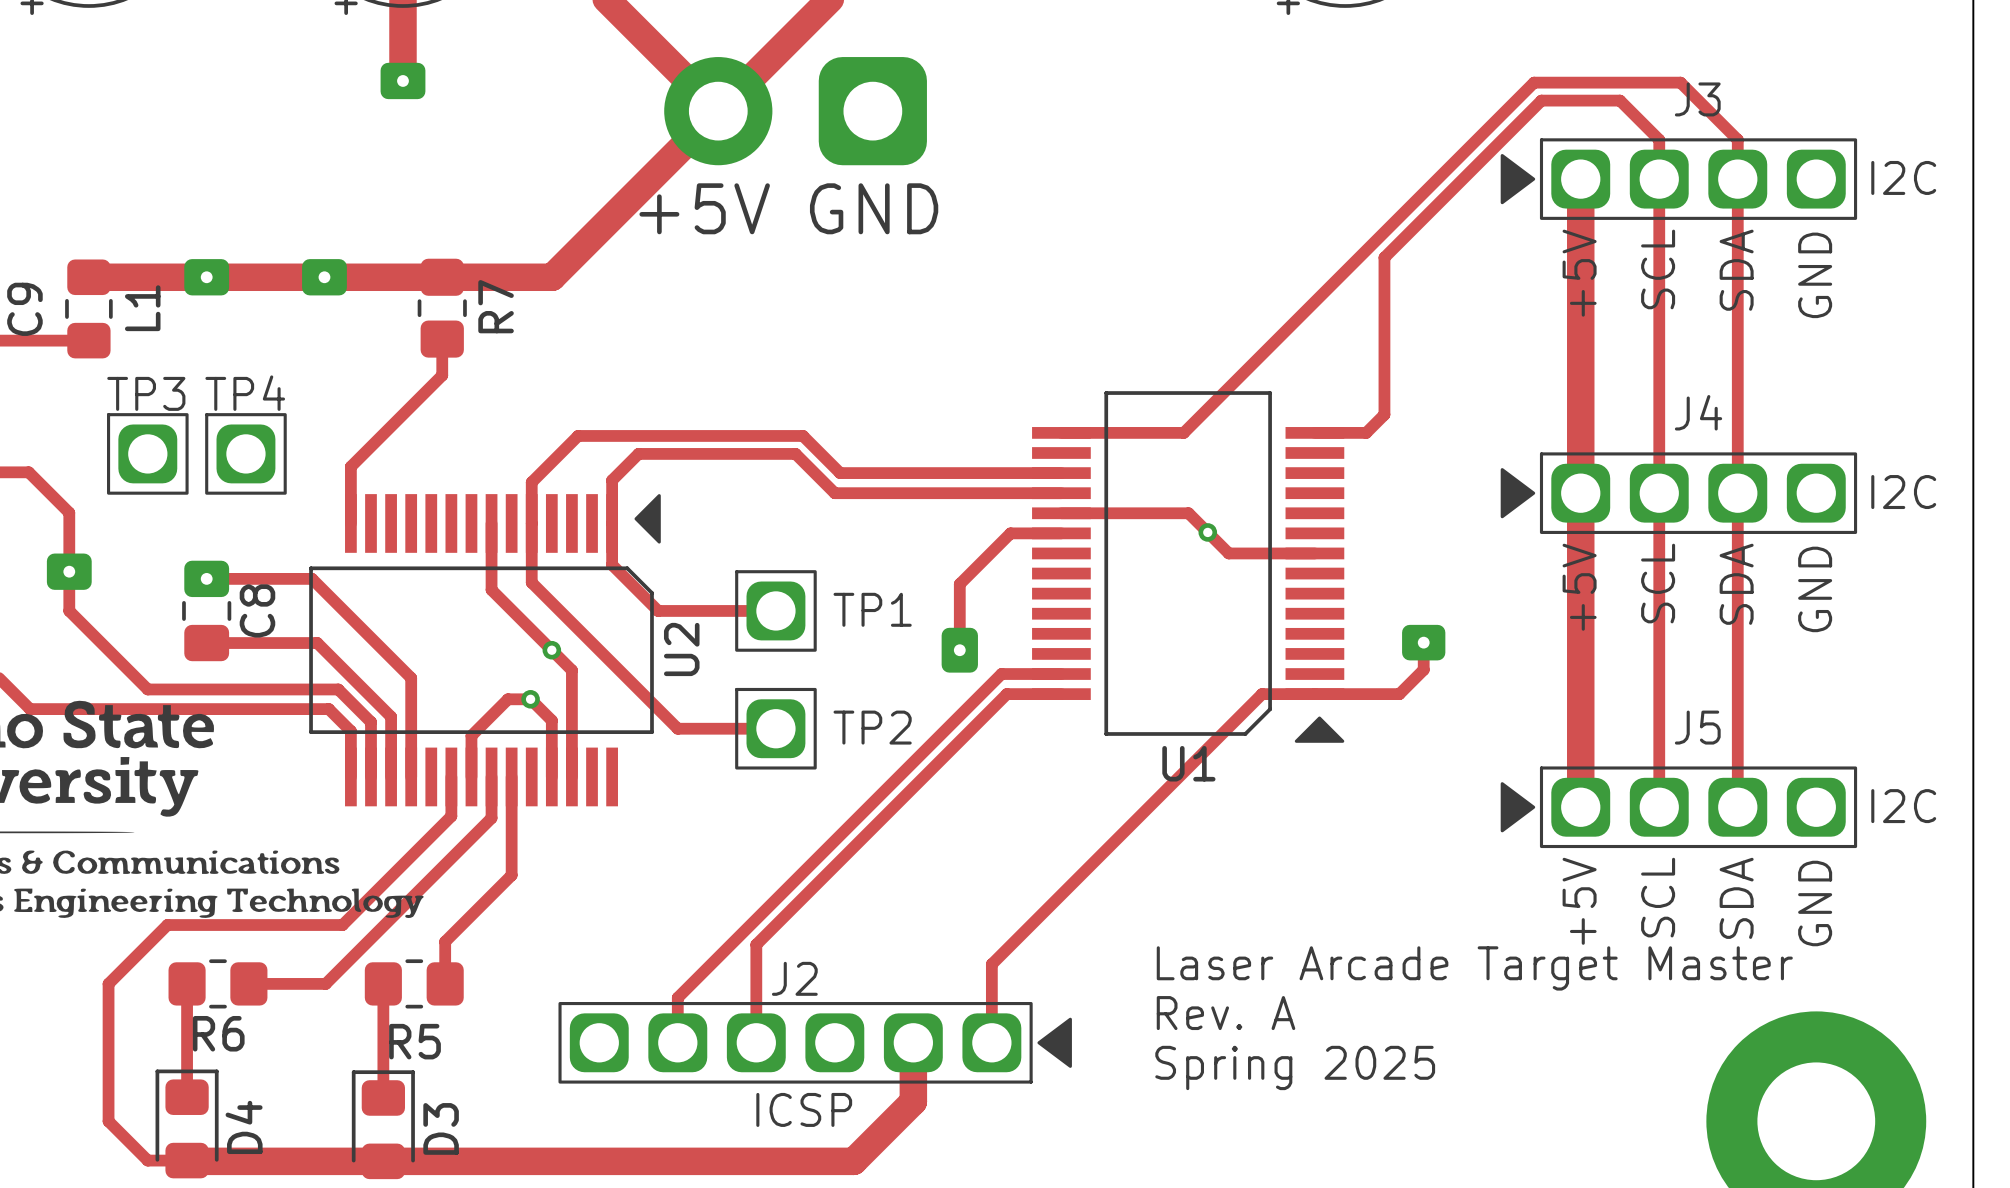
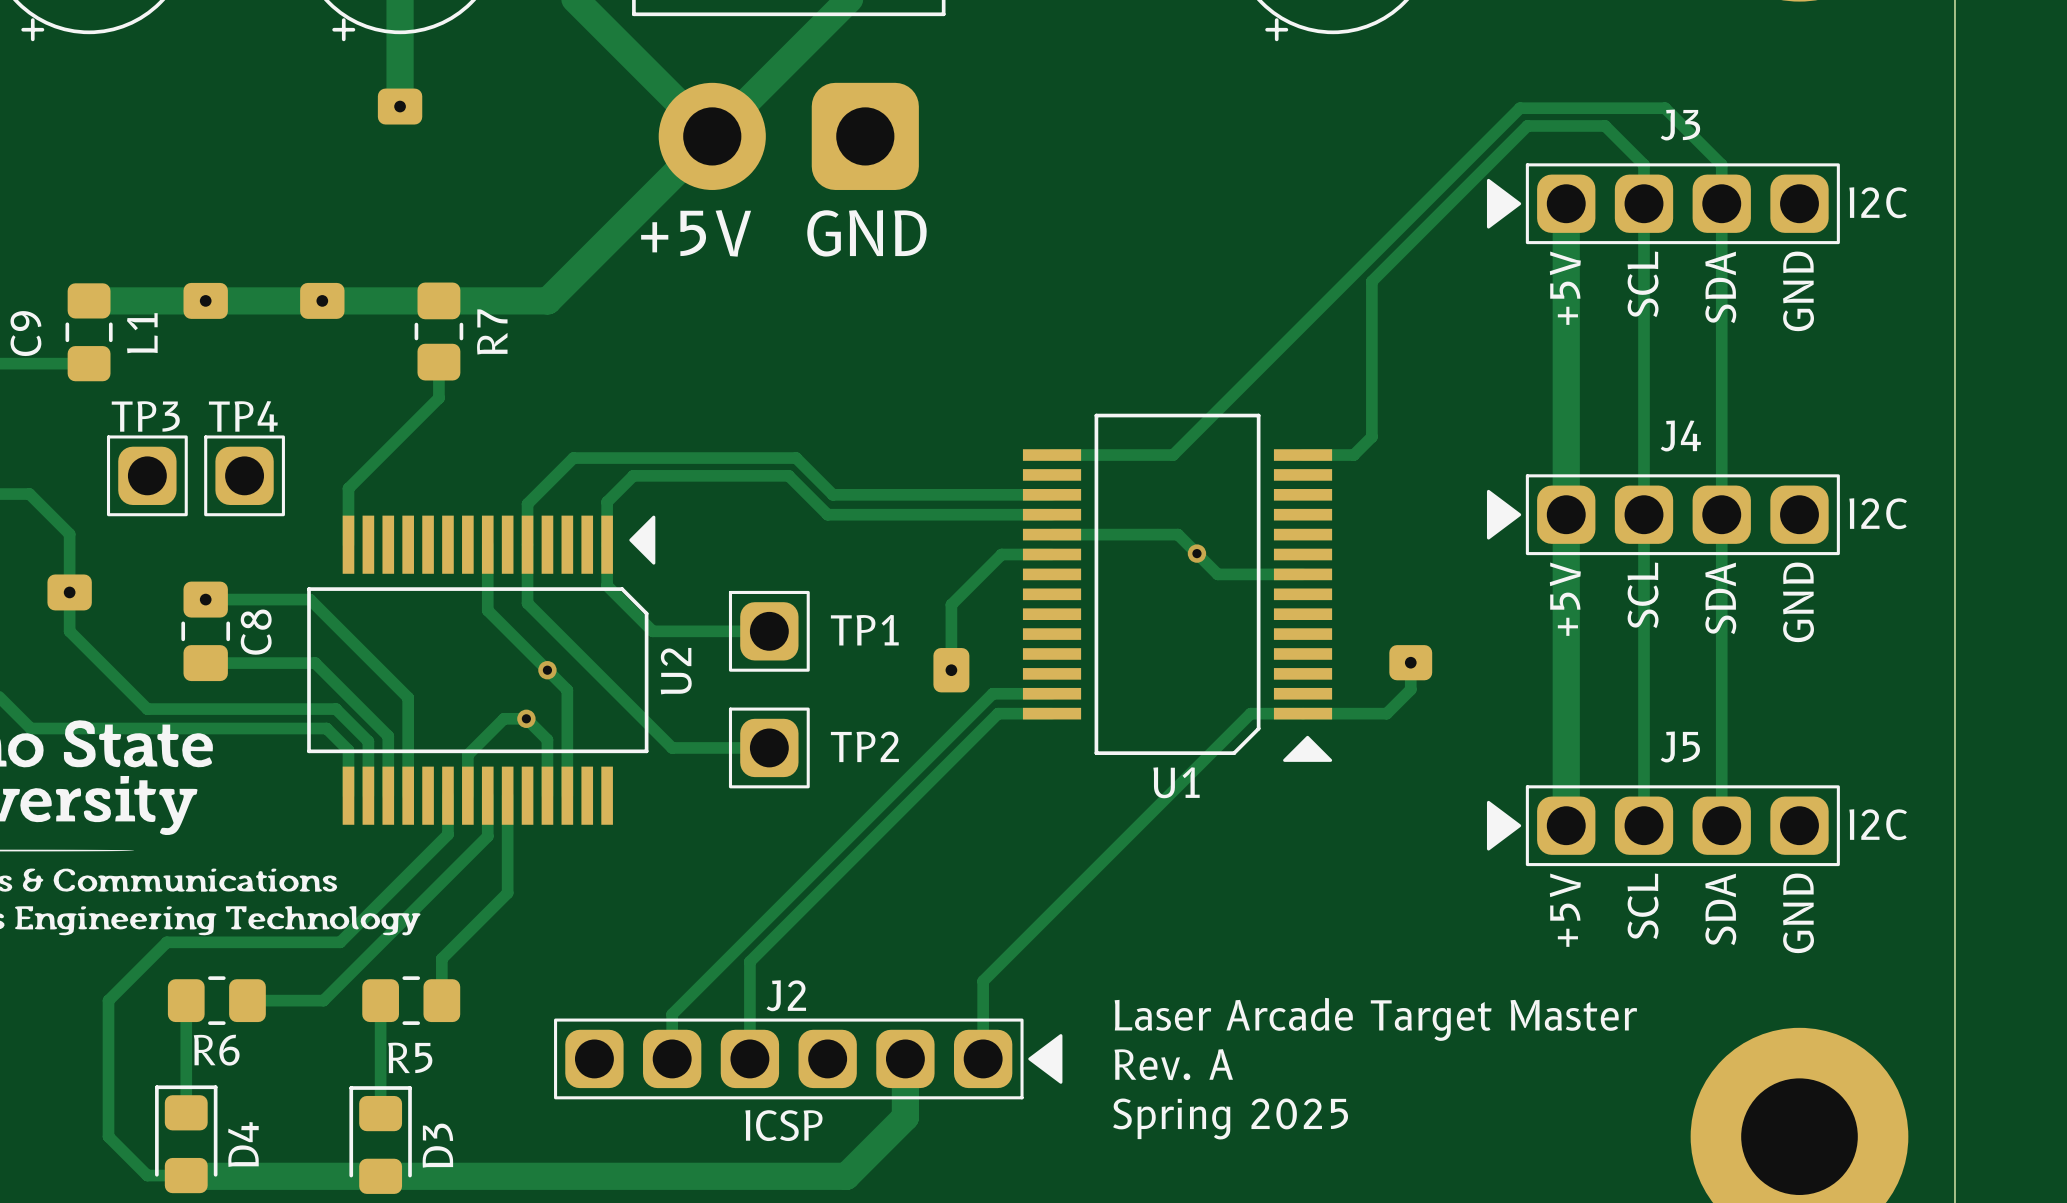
text position: Laser Arcade Target Master (1474, 968) -> Laser Arcade Target Master (1375, 1019)
text position: Rev. A (1226, 1013) -> Rev. A (1173, 1064)
text position: Spring 2025 (1295, 1067) -> Spring 2025 (1230, 1118)

